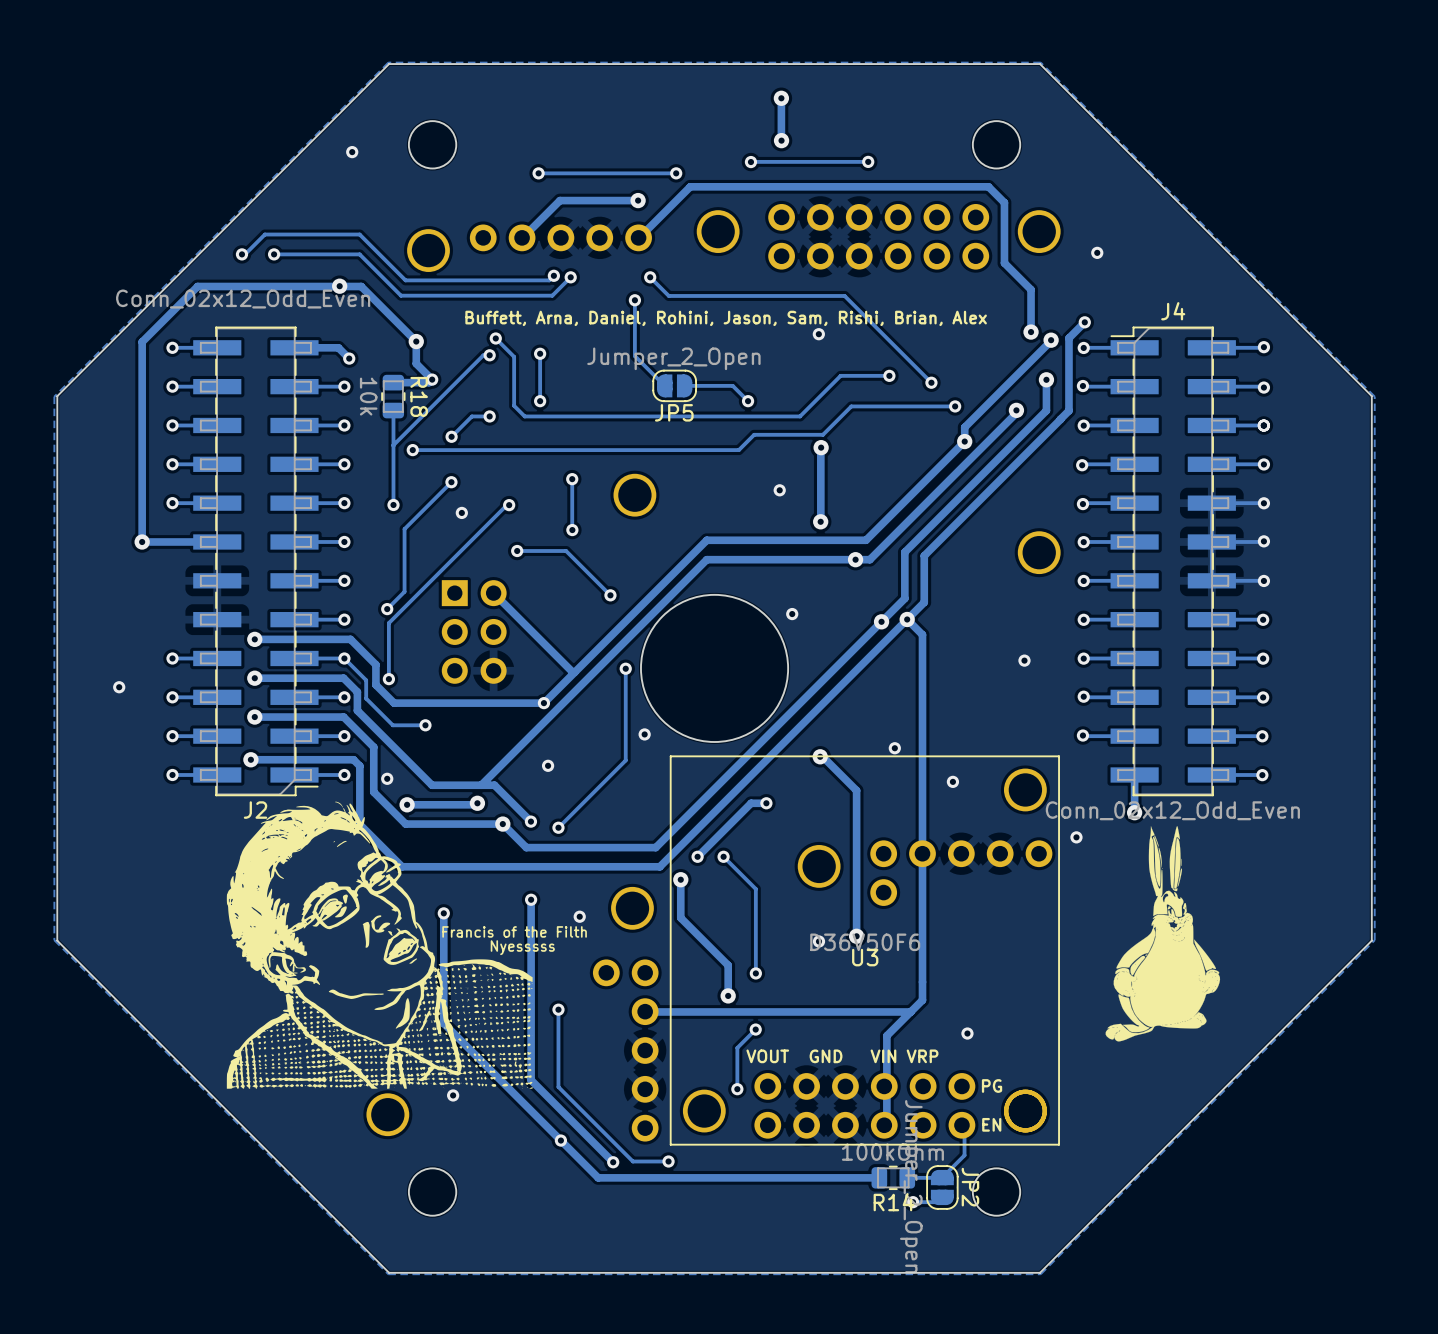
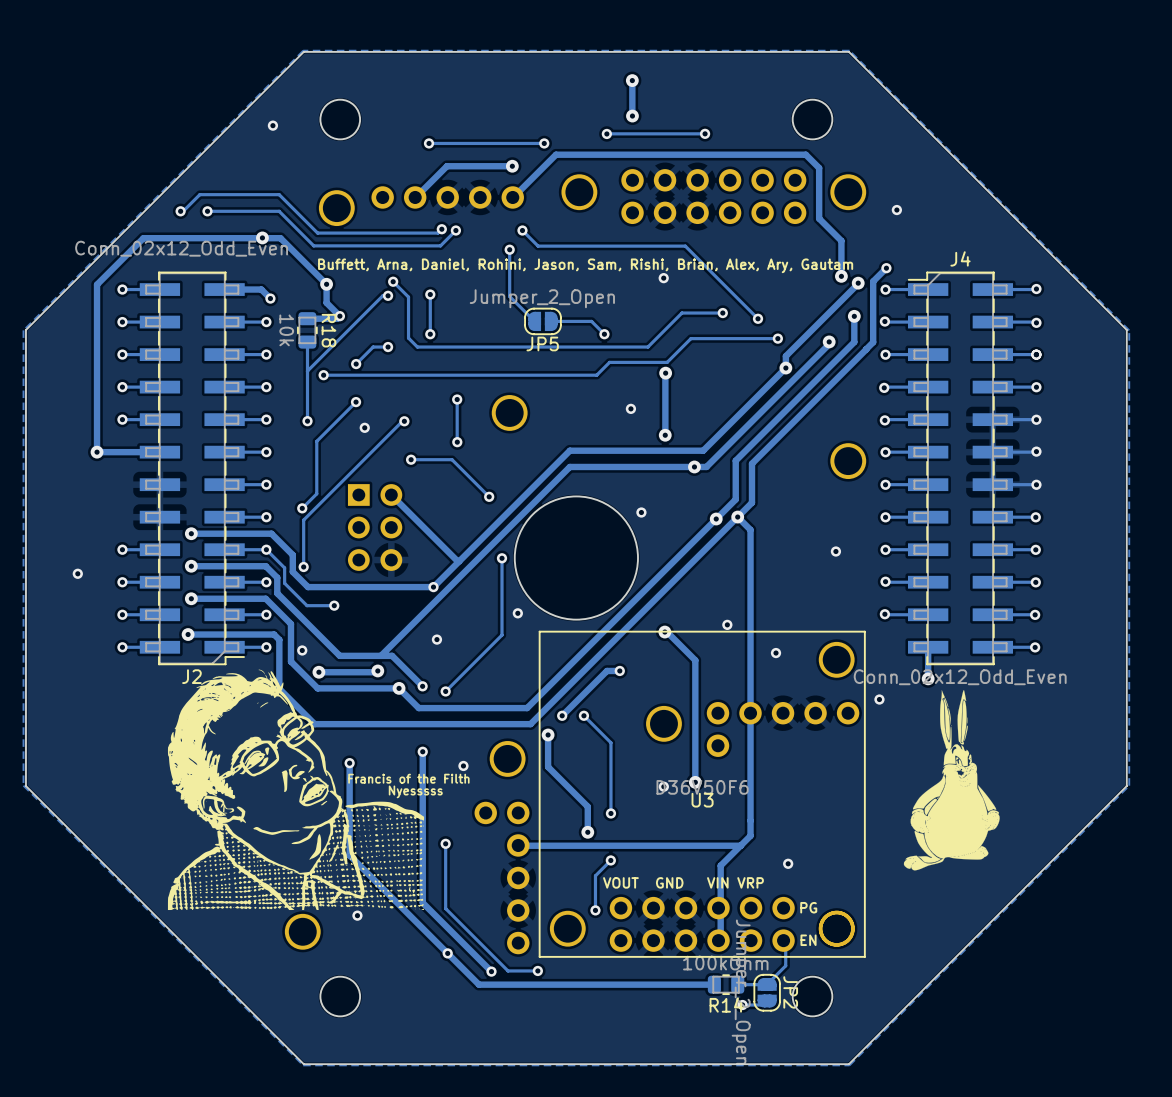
text: Buffett, Arna, Daniel, Rohini, Jason, Sam, Rishi, Brian, Alex (726, 318) -> Buffett, Arna, Daniel, Rohini, Jason, Sam, Rishi, Brian, Alex, Ary, Gautam (585, 265)

